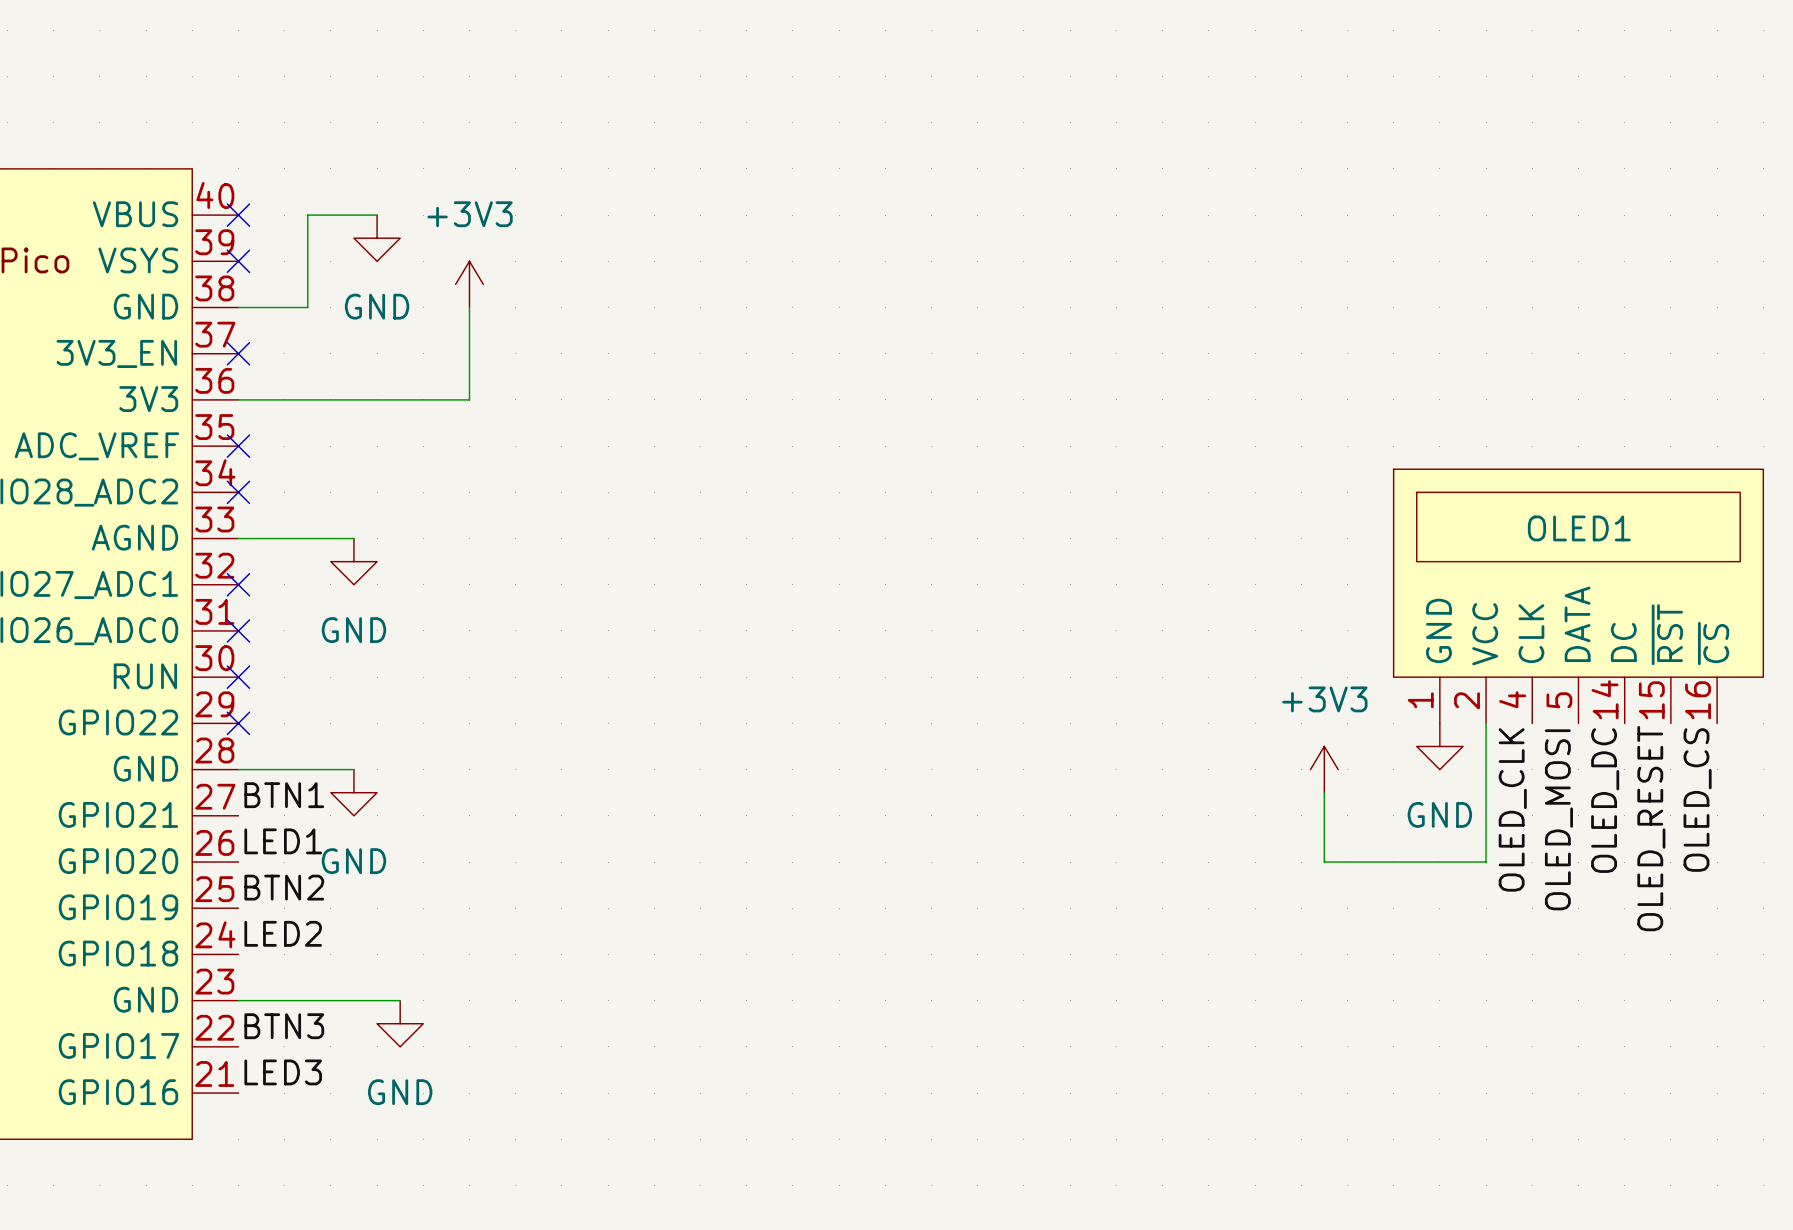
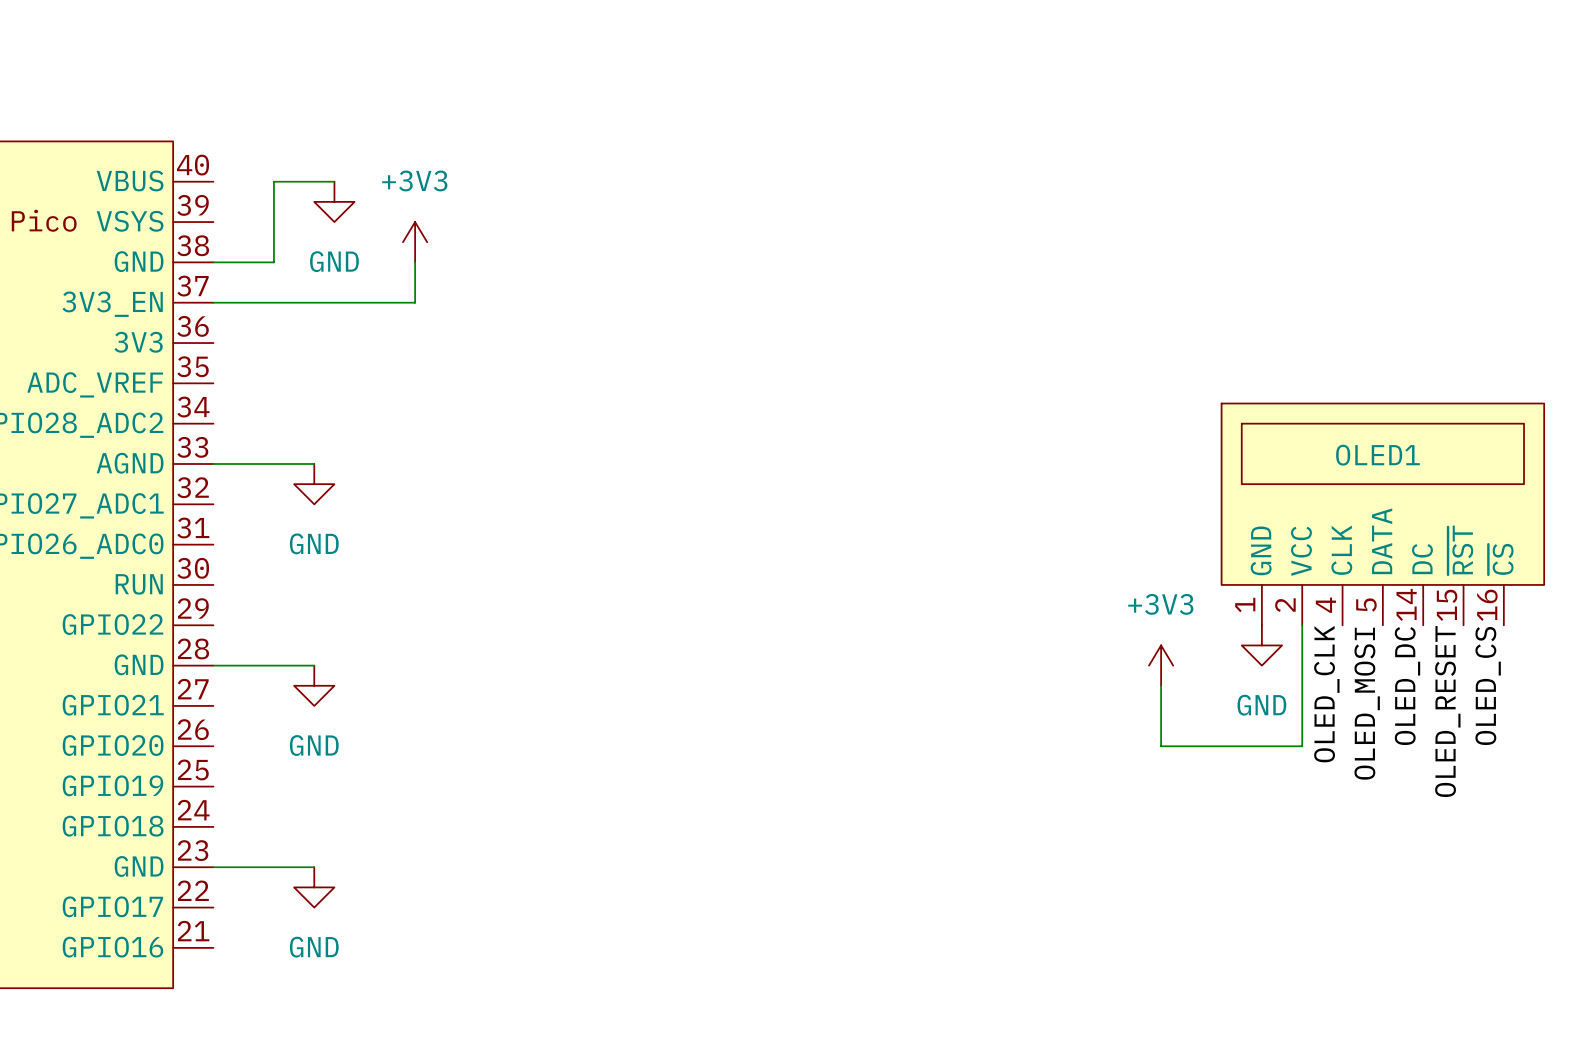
no-connect mark: (238, 215) -> none
no-connect mark: (238, 261) -> none
no-connect mark: (238, 353) -> none
wire: (469, 353) (469, 399) (238, 399) -> (415, 302) (213, 302)
no-connect mark: (238, 446) -> none
no-connect mark: (238, 492) -> none
no-connect mark: (238, 584) -> none
no-connect mark: (238, 630) -> none
no-connect mark: (238, 677) -> none
no-connect mark: (238, 723) -> none
label: BTN1 (284, 795) -> none
label: LED1 (283, 841) -> none
label: BTN2 (284, 887) -> none
label: LED2 (283, 933) -> none
wire: (353, 1000) (400, 1000) -> none
power symbol position: GND (400, 1023) -> GND (314, 887)
label: BTN3 (284, 1026) -> none
label: LED3 (283, 1072) -> none

